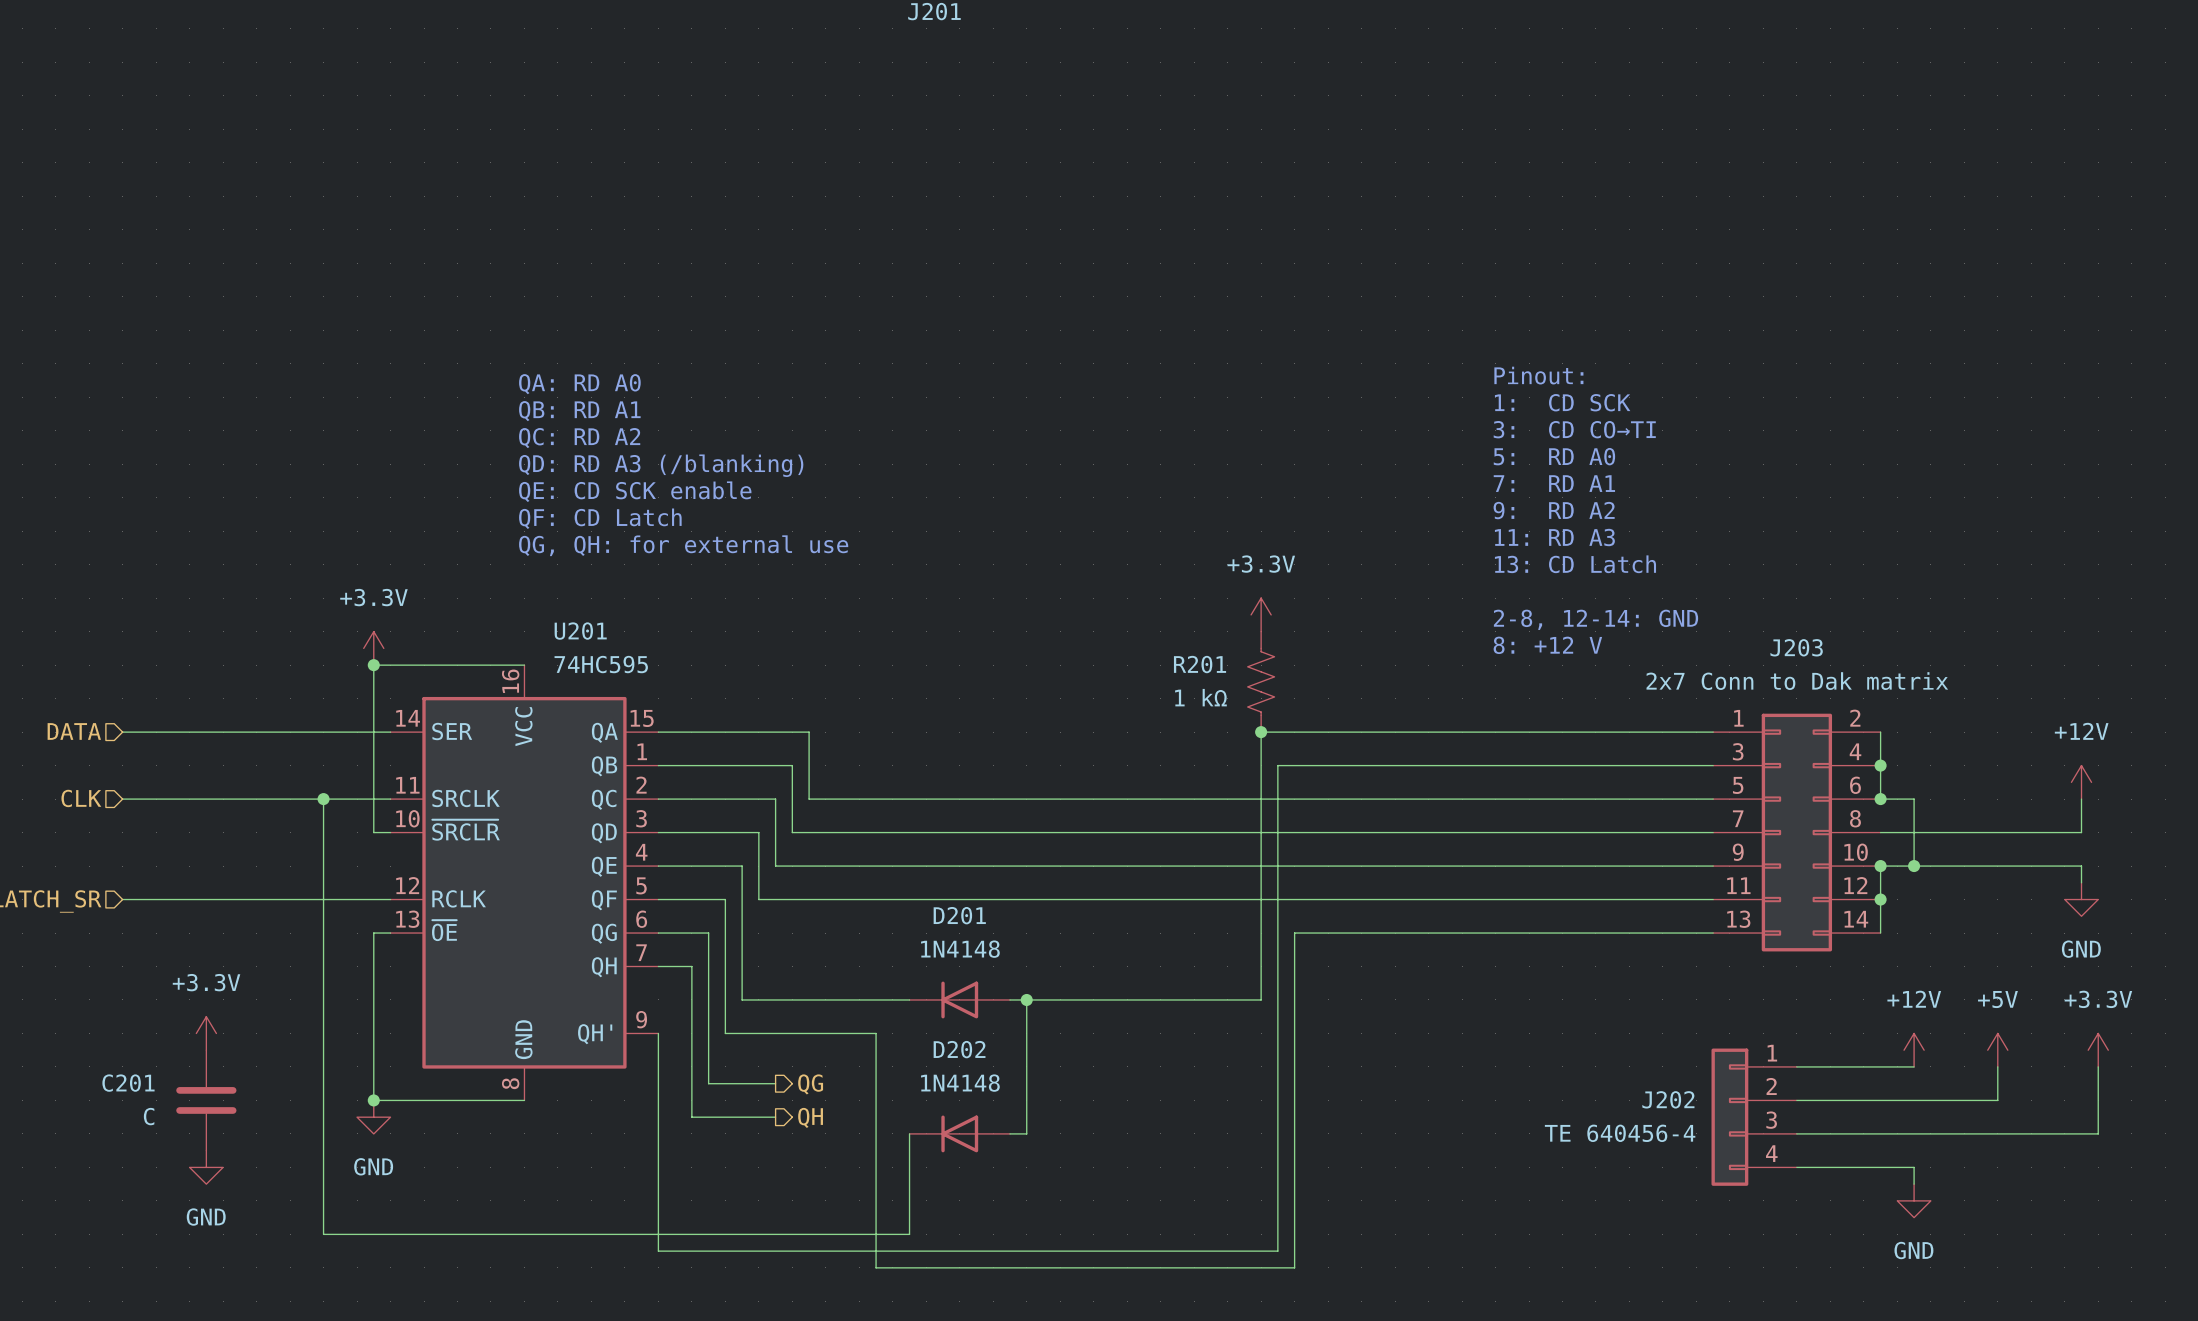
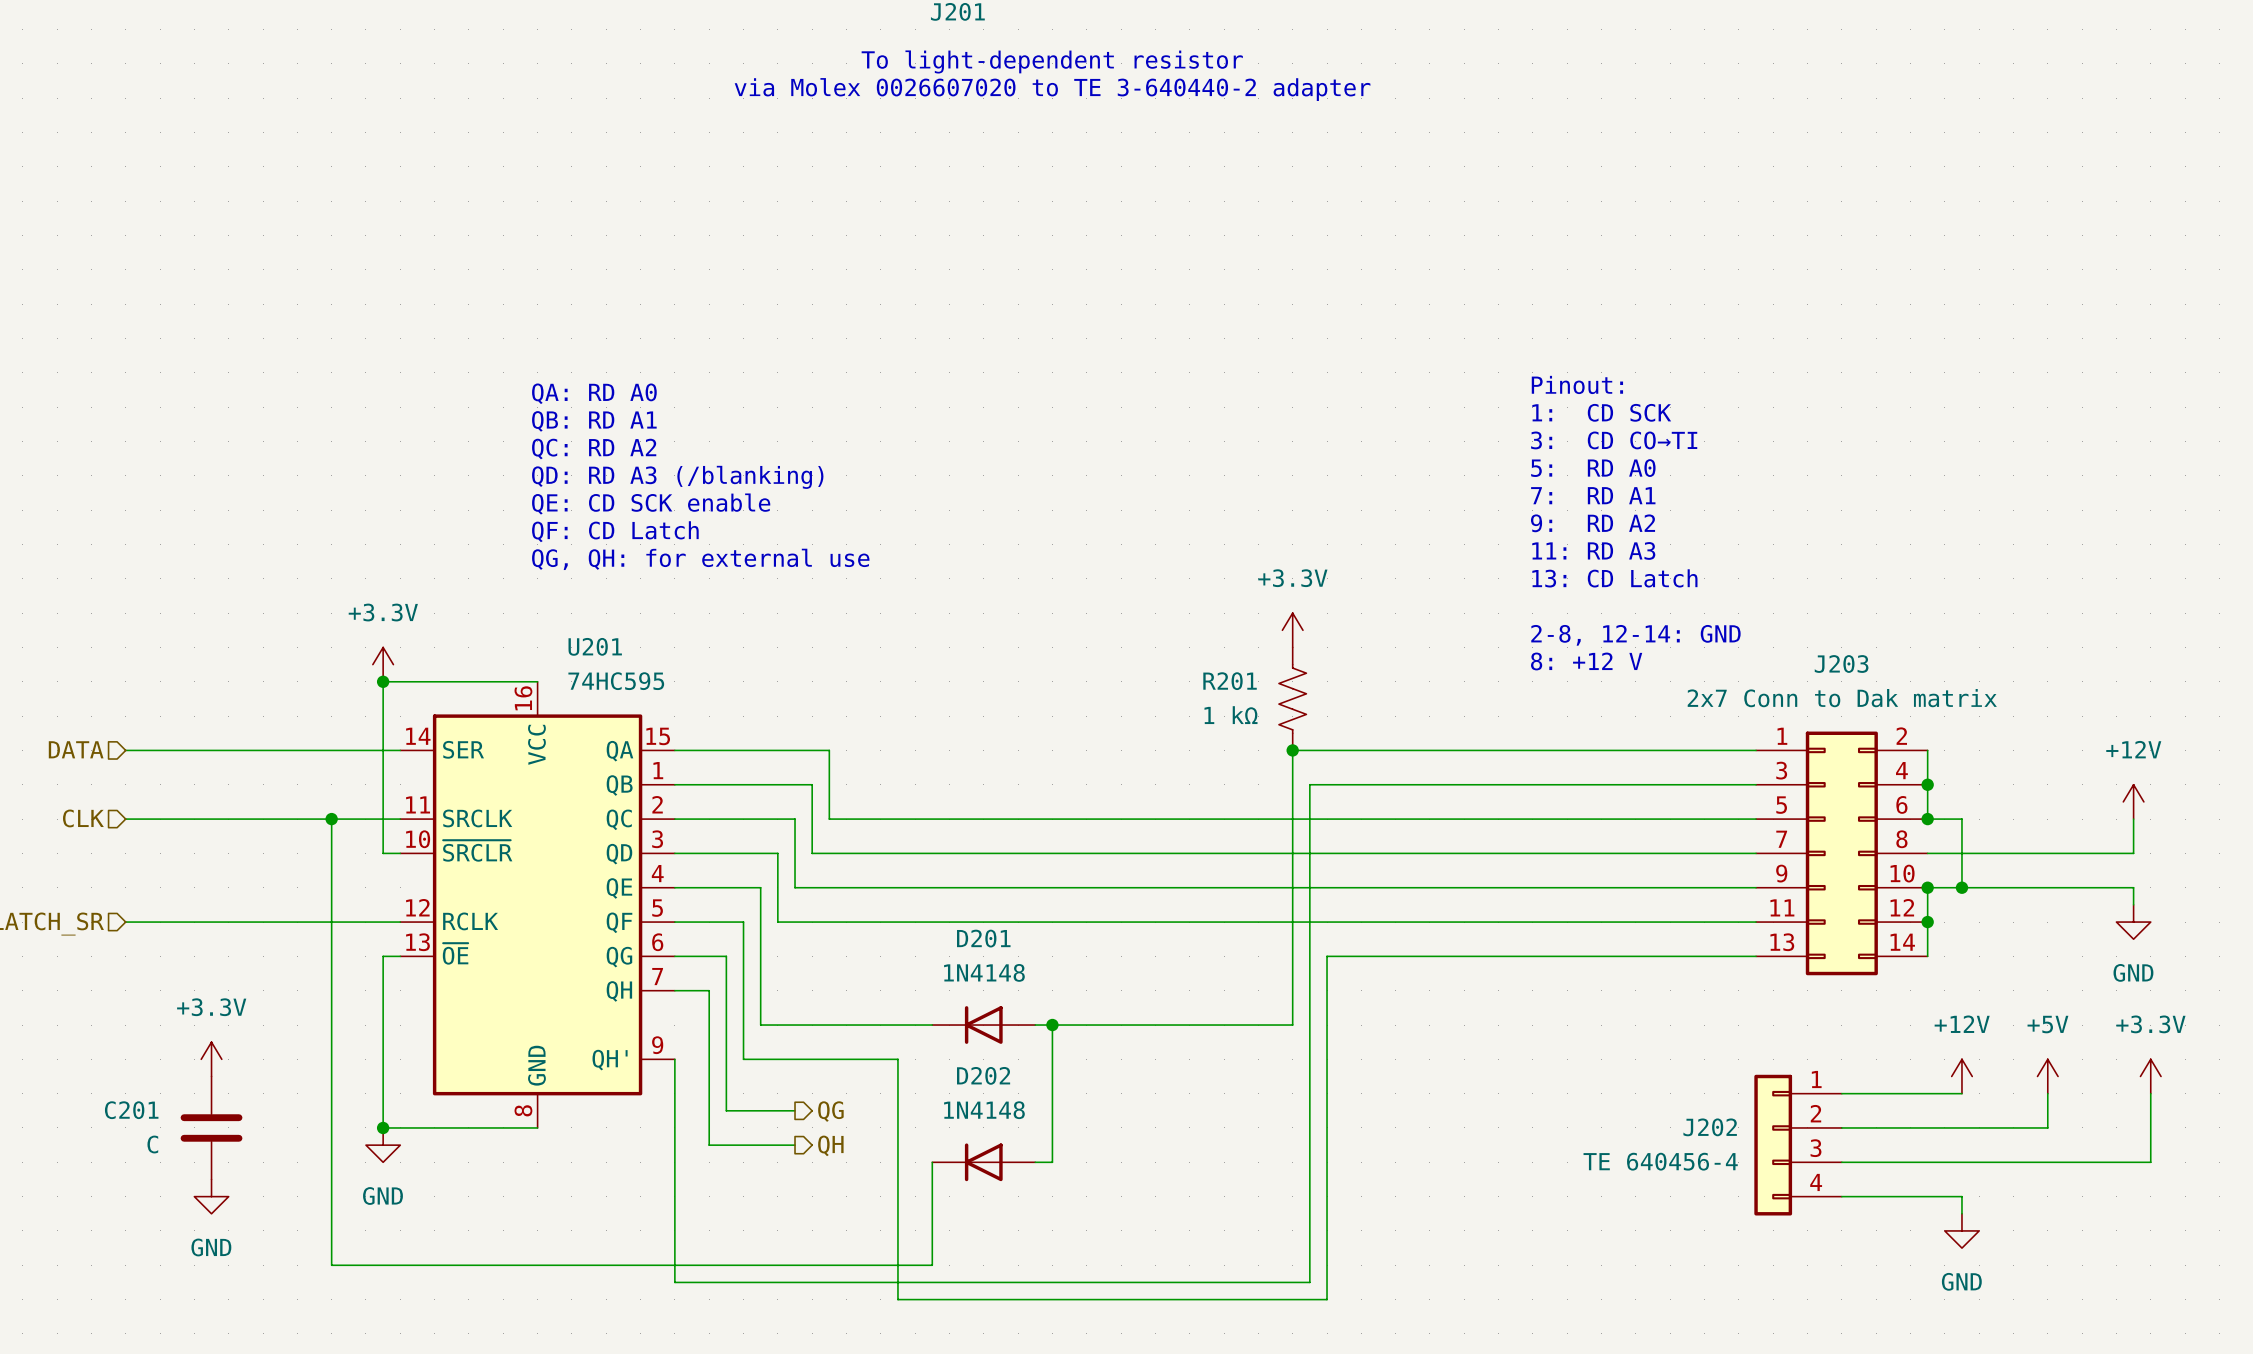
text: none -> To light-dependent resistor (1052, 61)
text: none -> via Molex 0026607020 to TE 3-640440-2 adapter (1052, 89)

